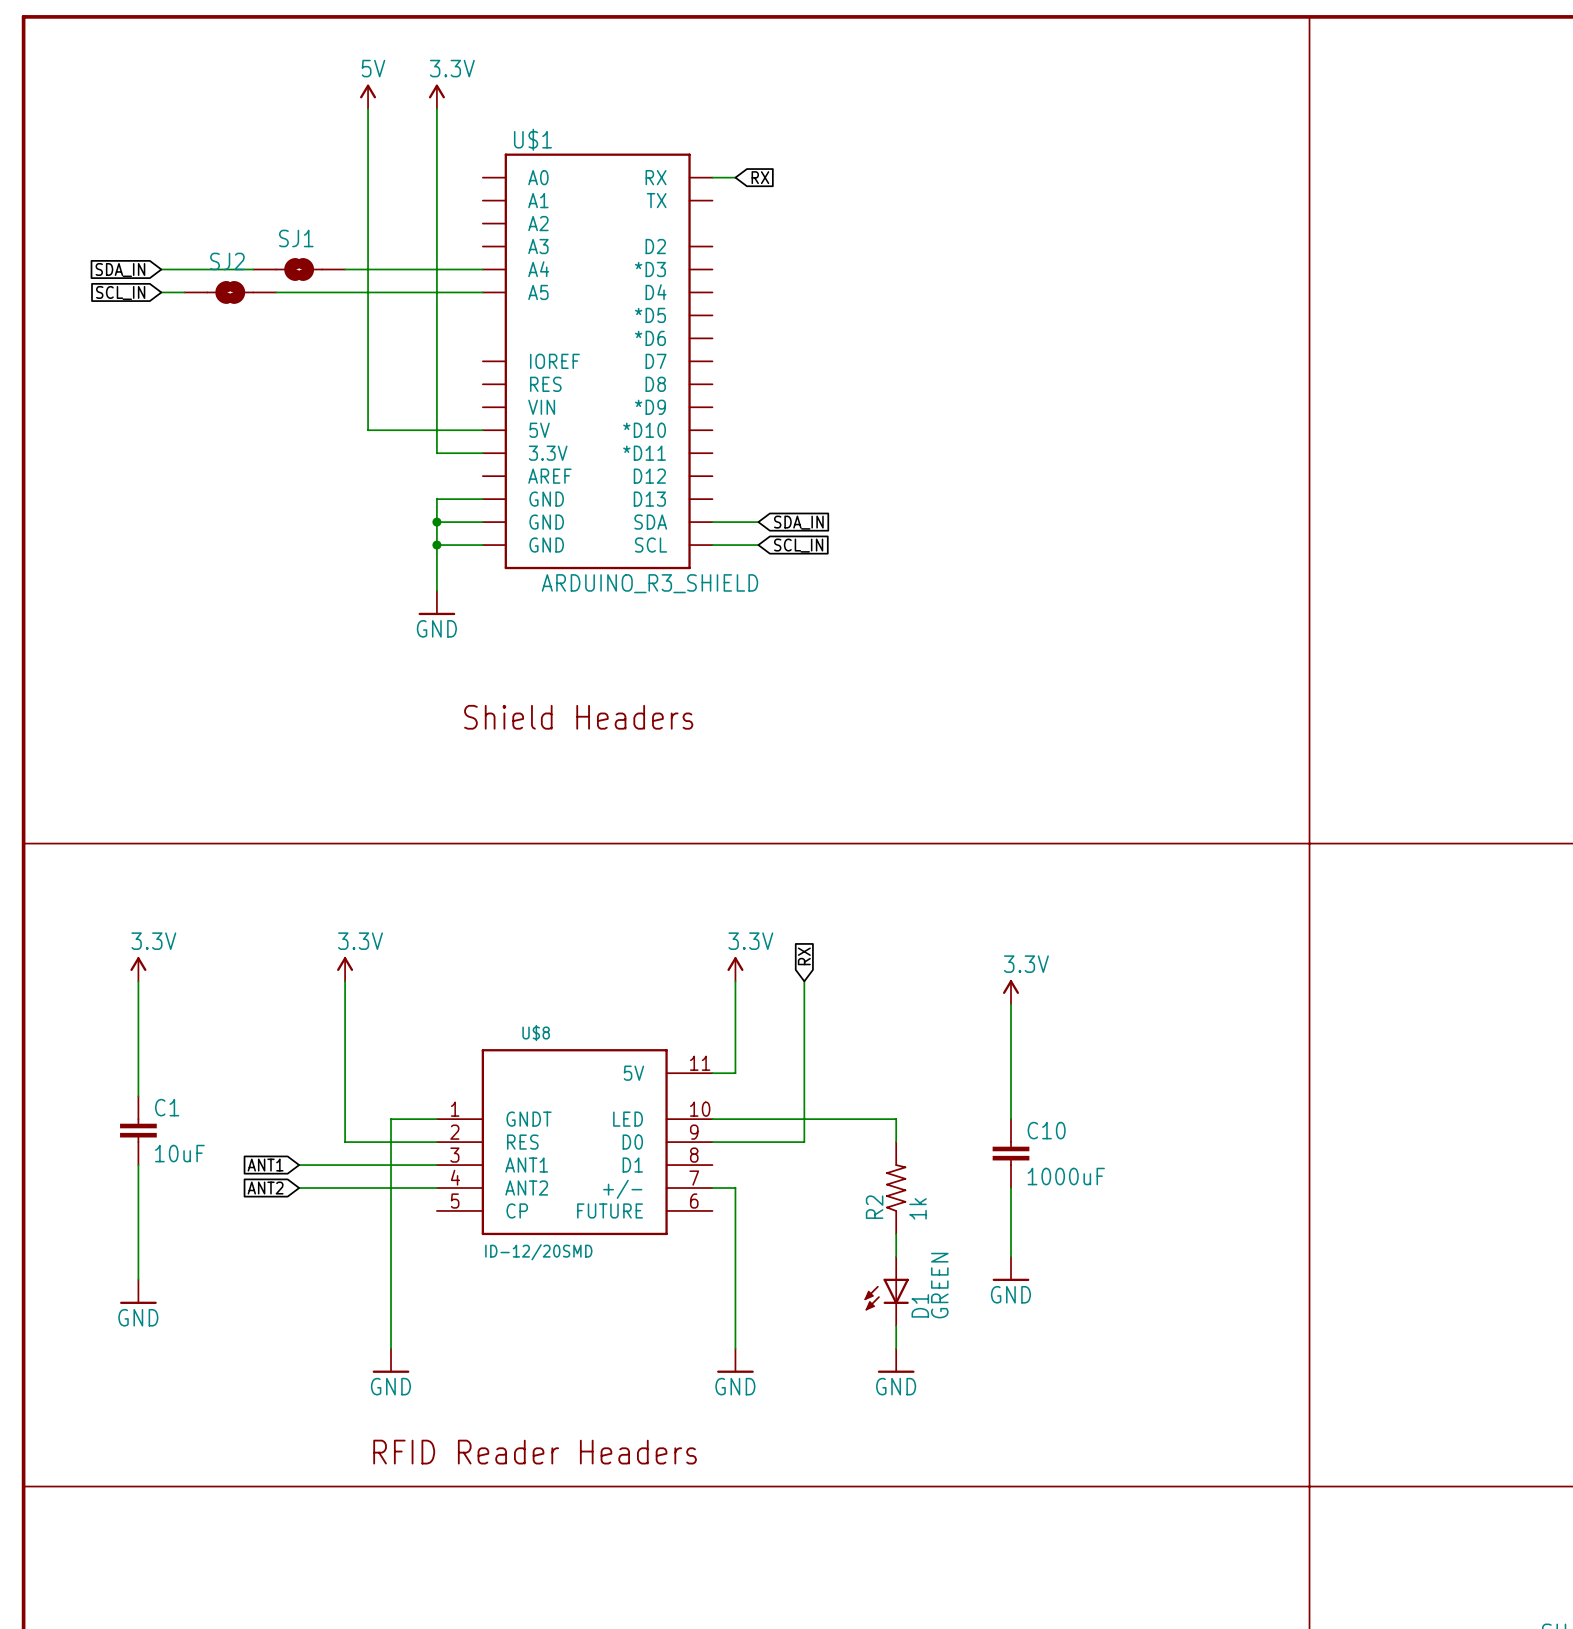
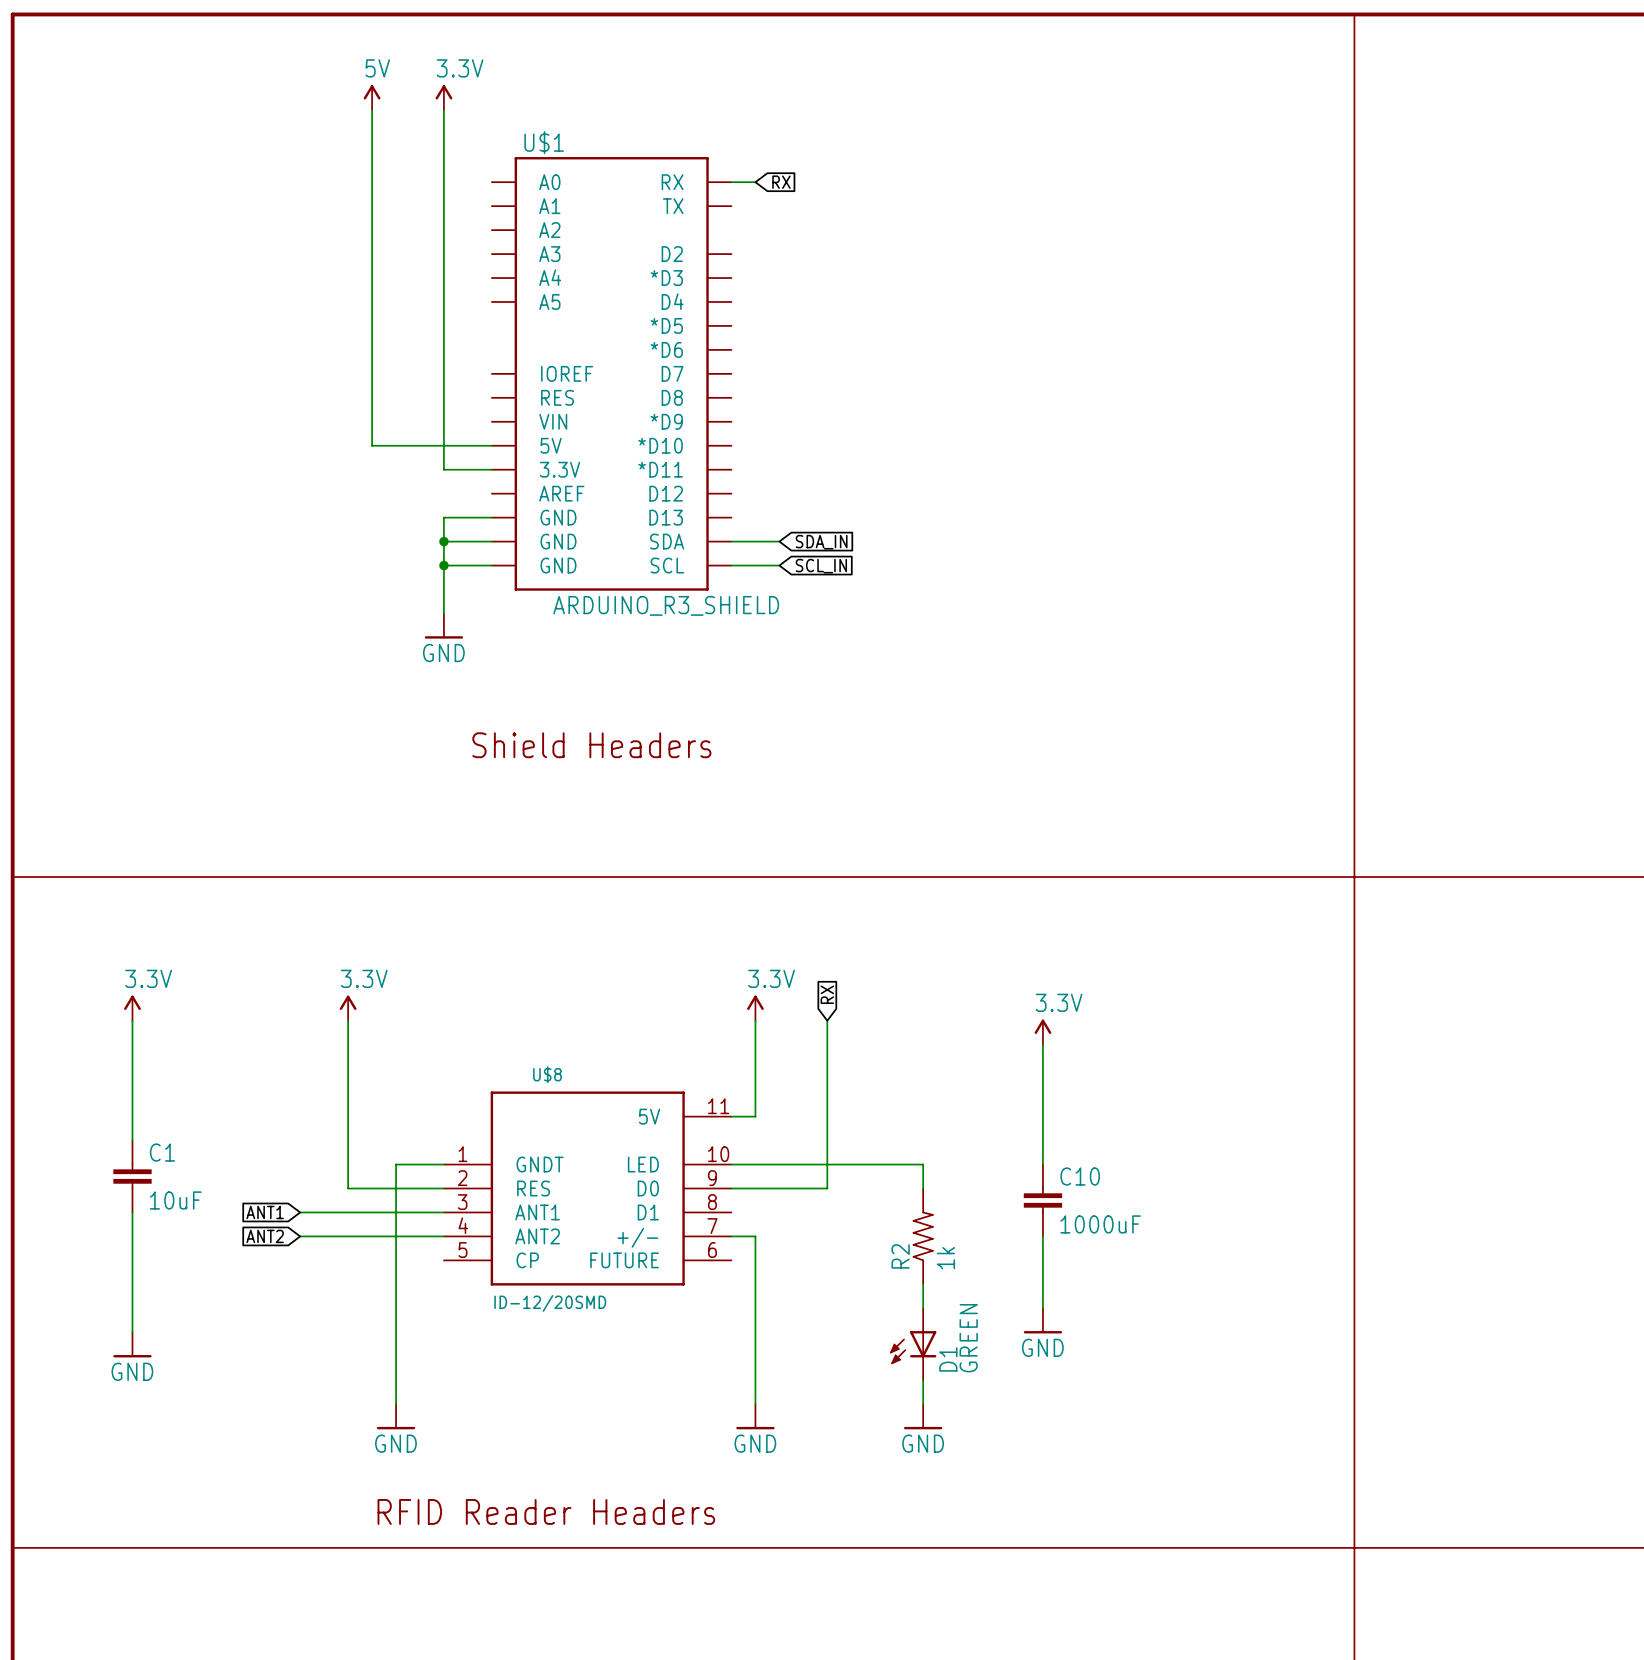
wire: (161, 269) (253, 269) -> none
SJ1: (299, 269) -> none
wire: (345, 269) (482, 269) -> none
global label: SDA_IN (120, 270) -> none
wire: (161, 292) (184, 292) -> none
SJ2: (230, 292) -> none
wire: (276, 292) (482, 292) -> none
global label: SCL_IN (120, 293) -> none

